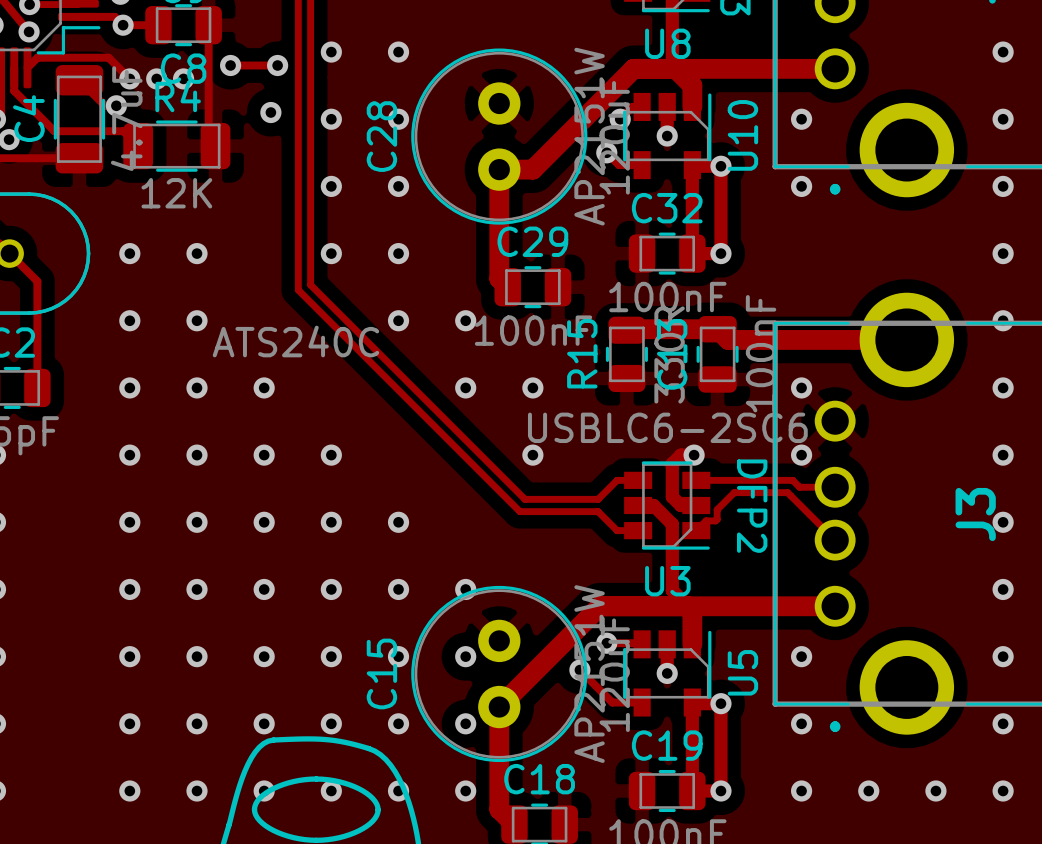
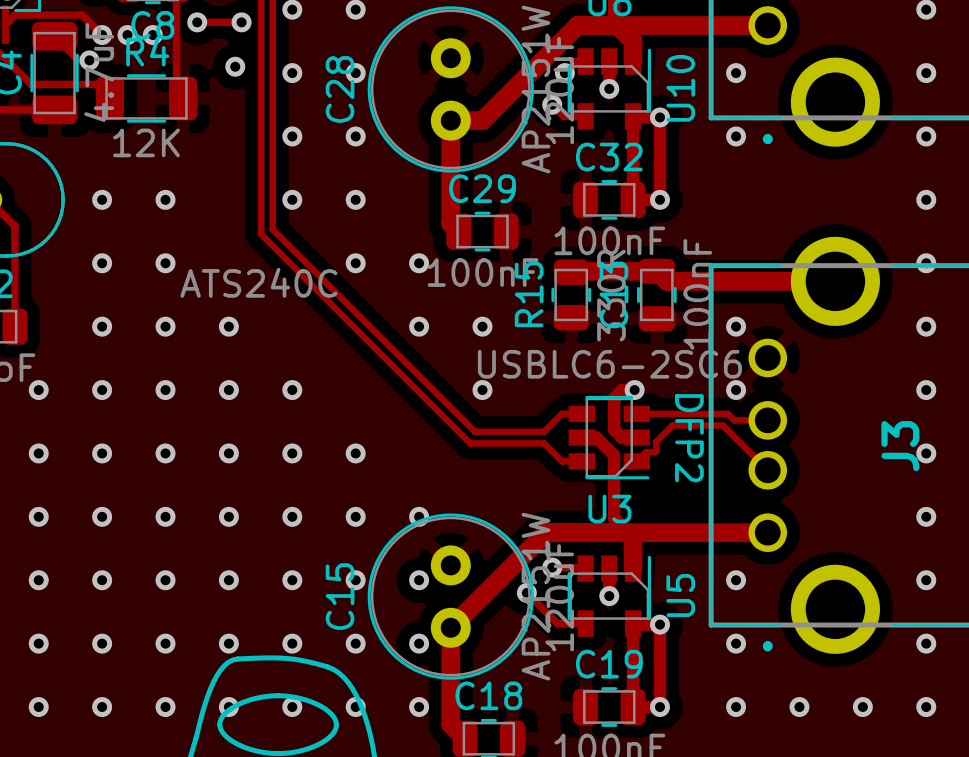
via: none -> (38, 390)
via: none -> (38, 453)
via: none -> (38, 516)
via: none -> (38, 580)
via: none -> (38, 643)
via: none -> (38, 707)

